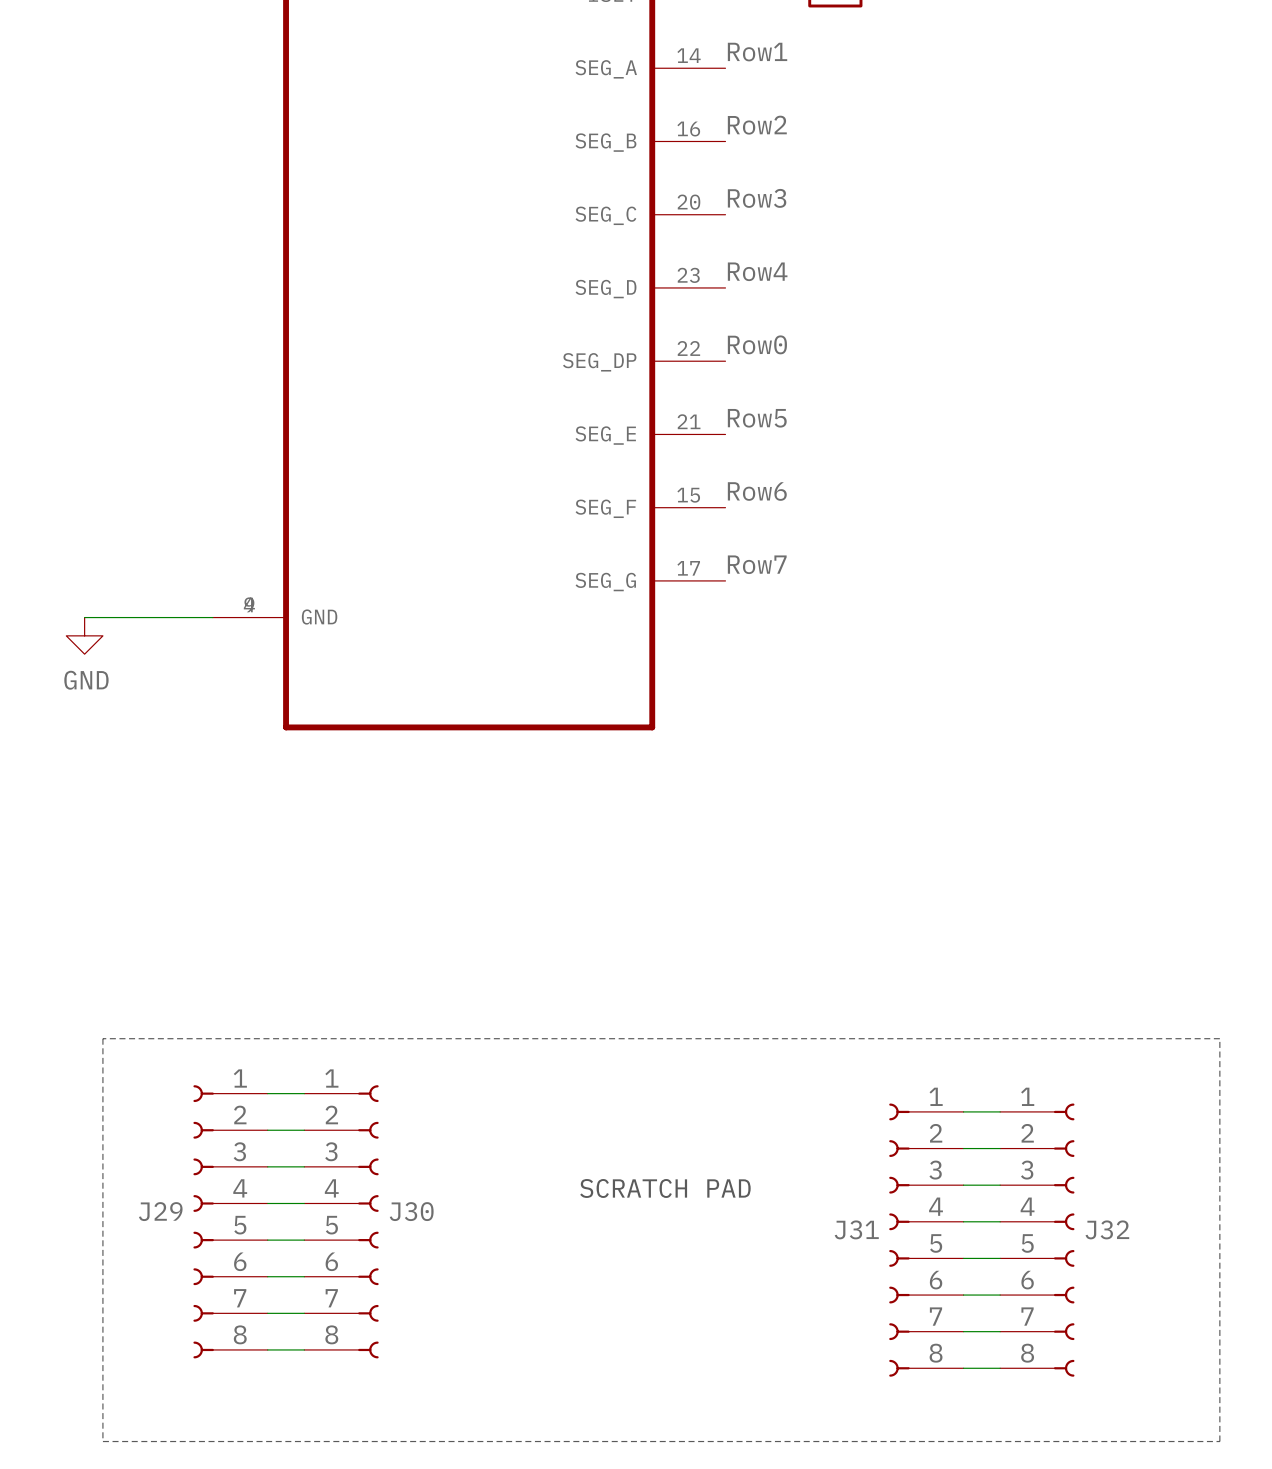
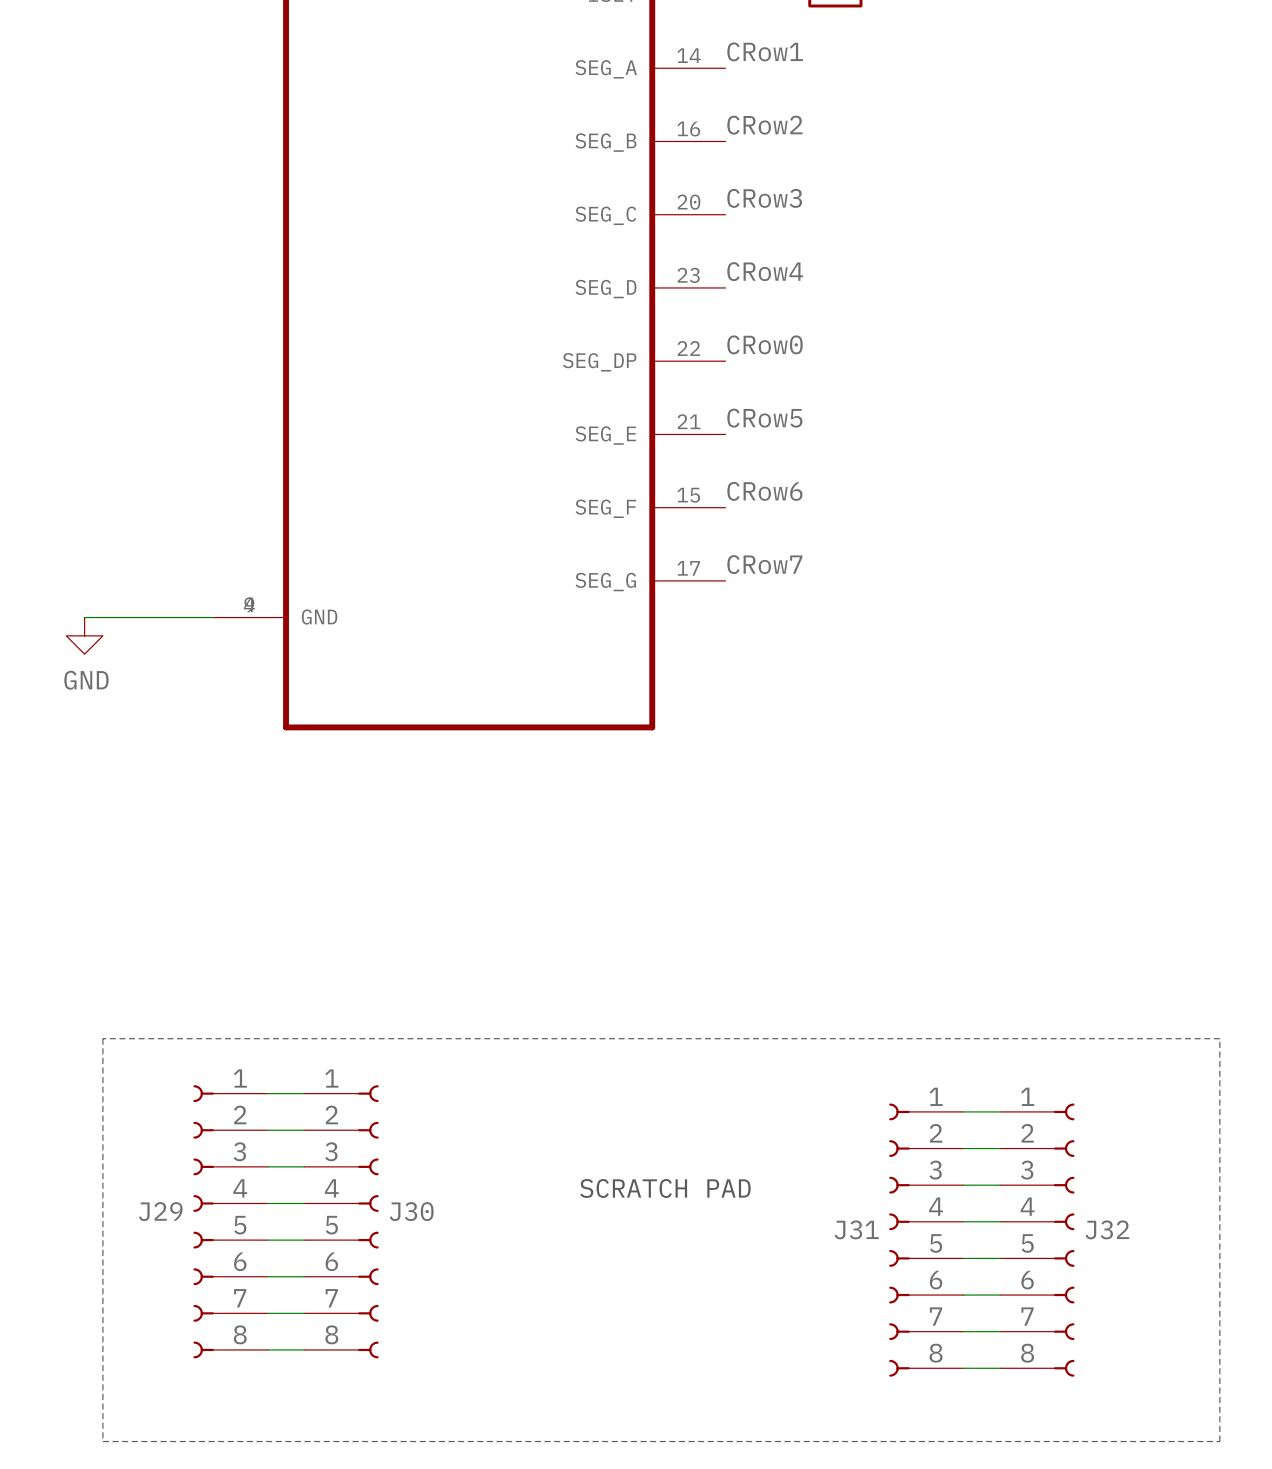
label: Row1 (757, 52) -> CRow1 (765, 51)
label: Row2 (757, 125) -> CRow2 (764, 125)
label: Row3 (757, 198) -> CRow3 (764, 198)
label: Row4 (757, 271) -> CRow4 (765, 271)
label: Row0 (757, 344) -> CRow0 (765, 344)
label: Row5 (757, 418) -> CRow5 (764, 418)
label: Row6 (757, 491) -> CRow6 (764, 491)
label: Row7 (757, 564) -> CRow7 (764, 564)

